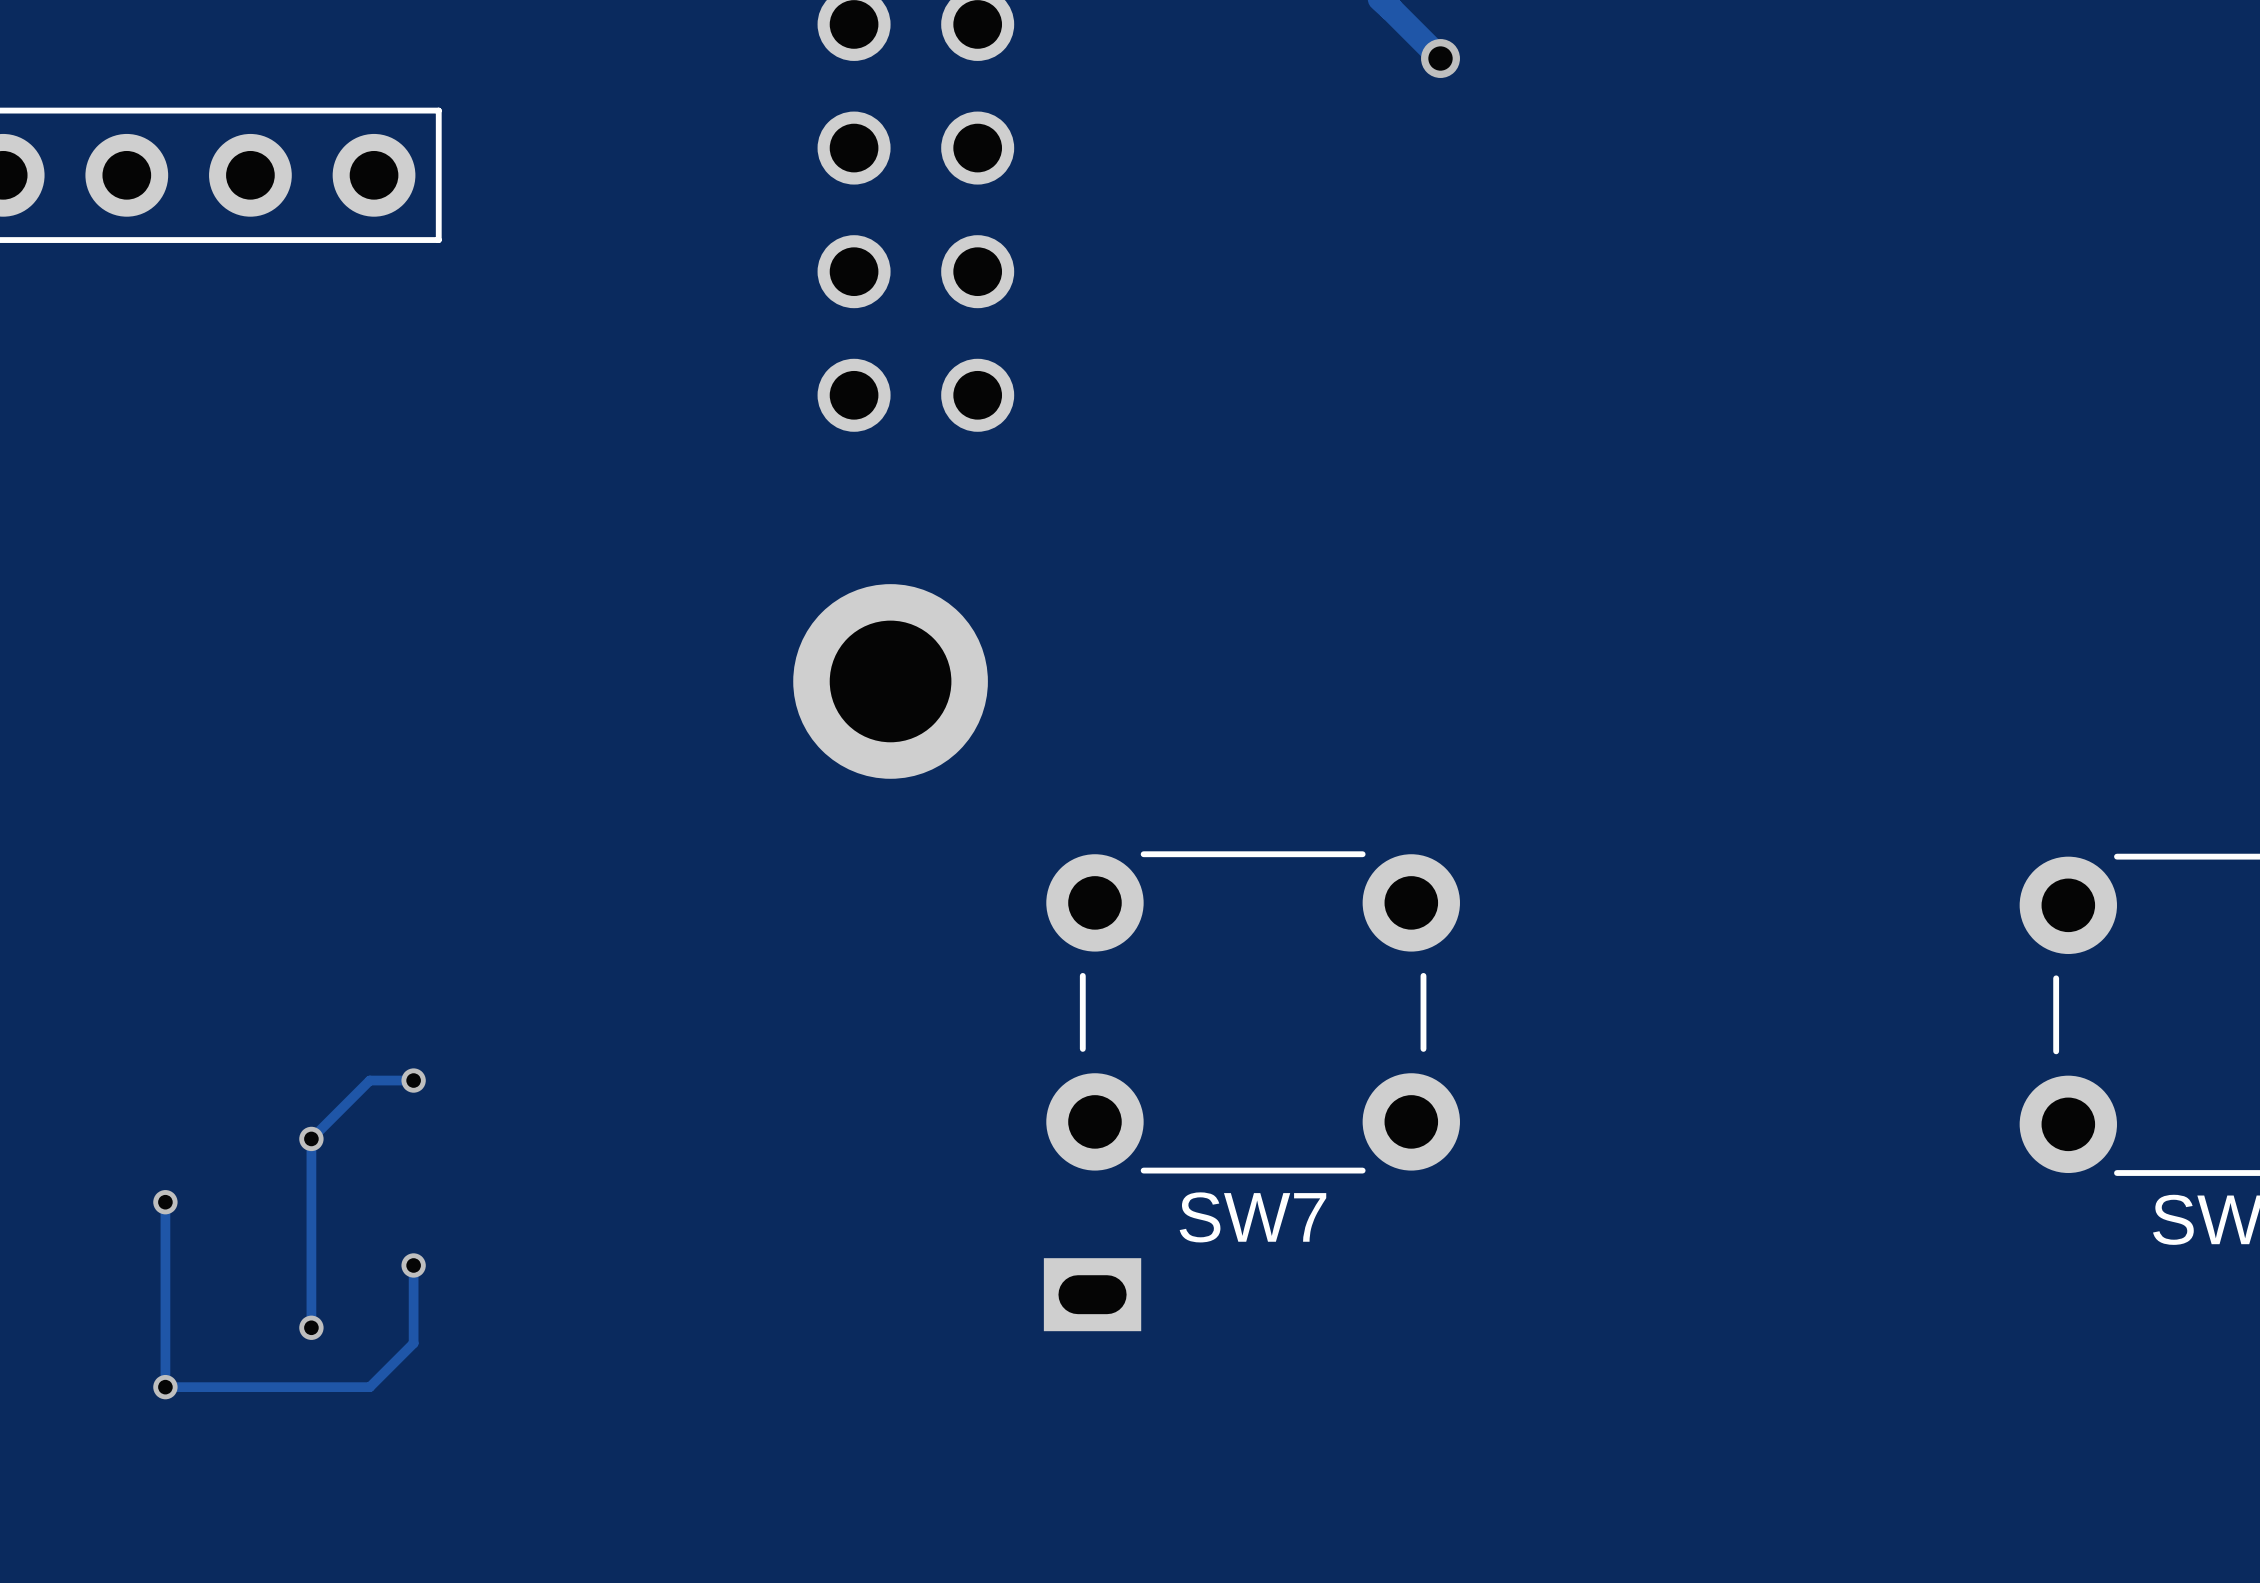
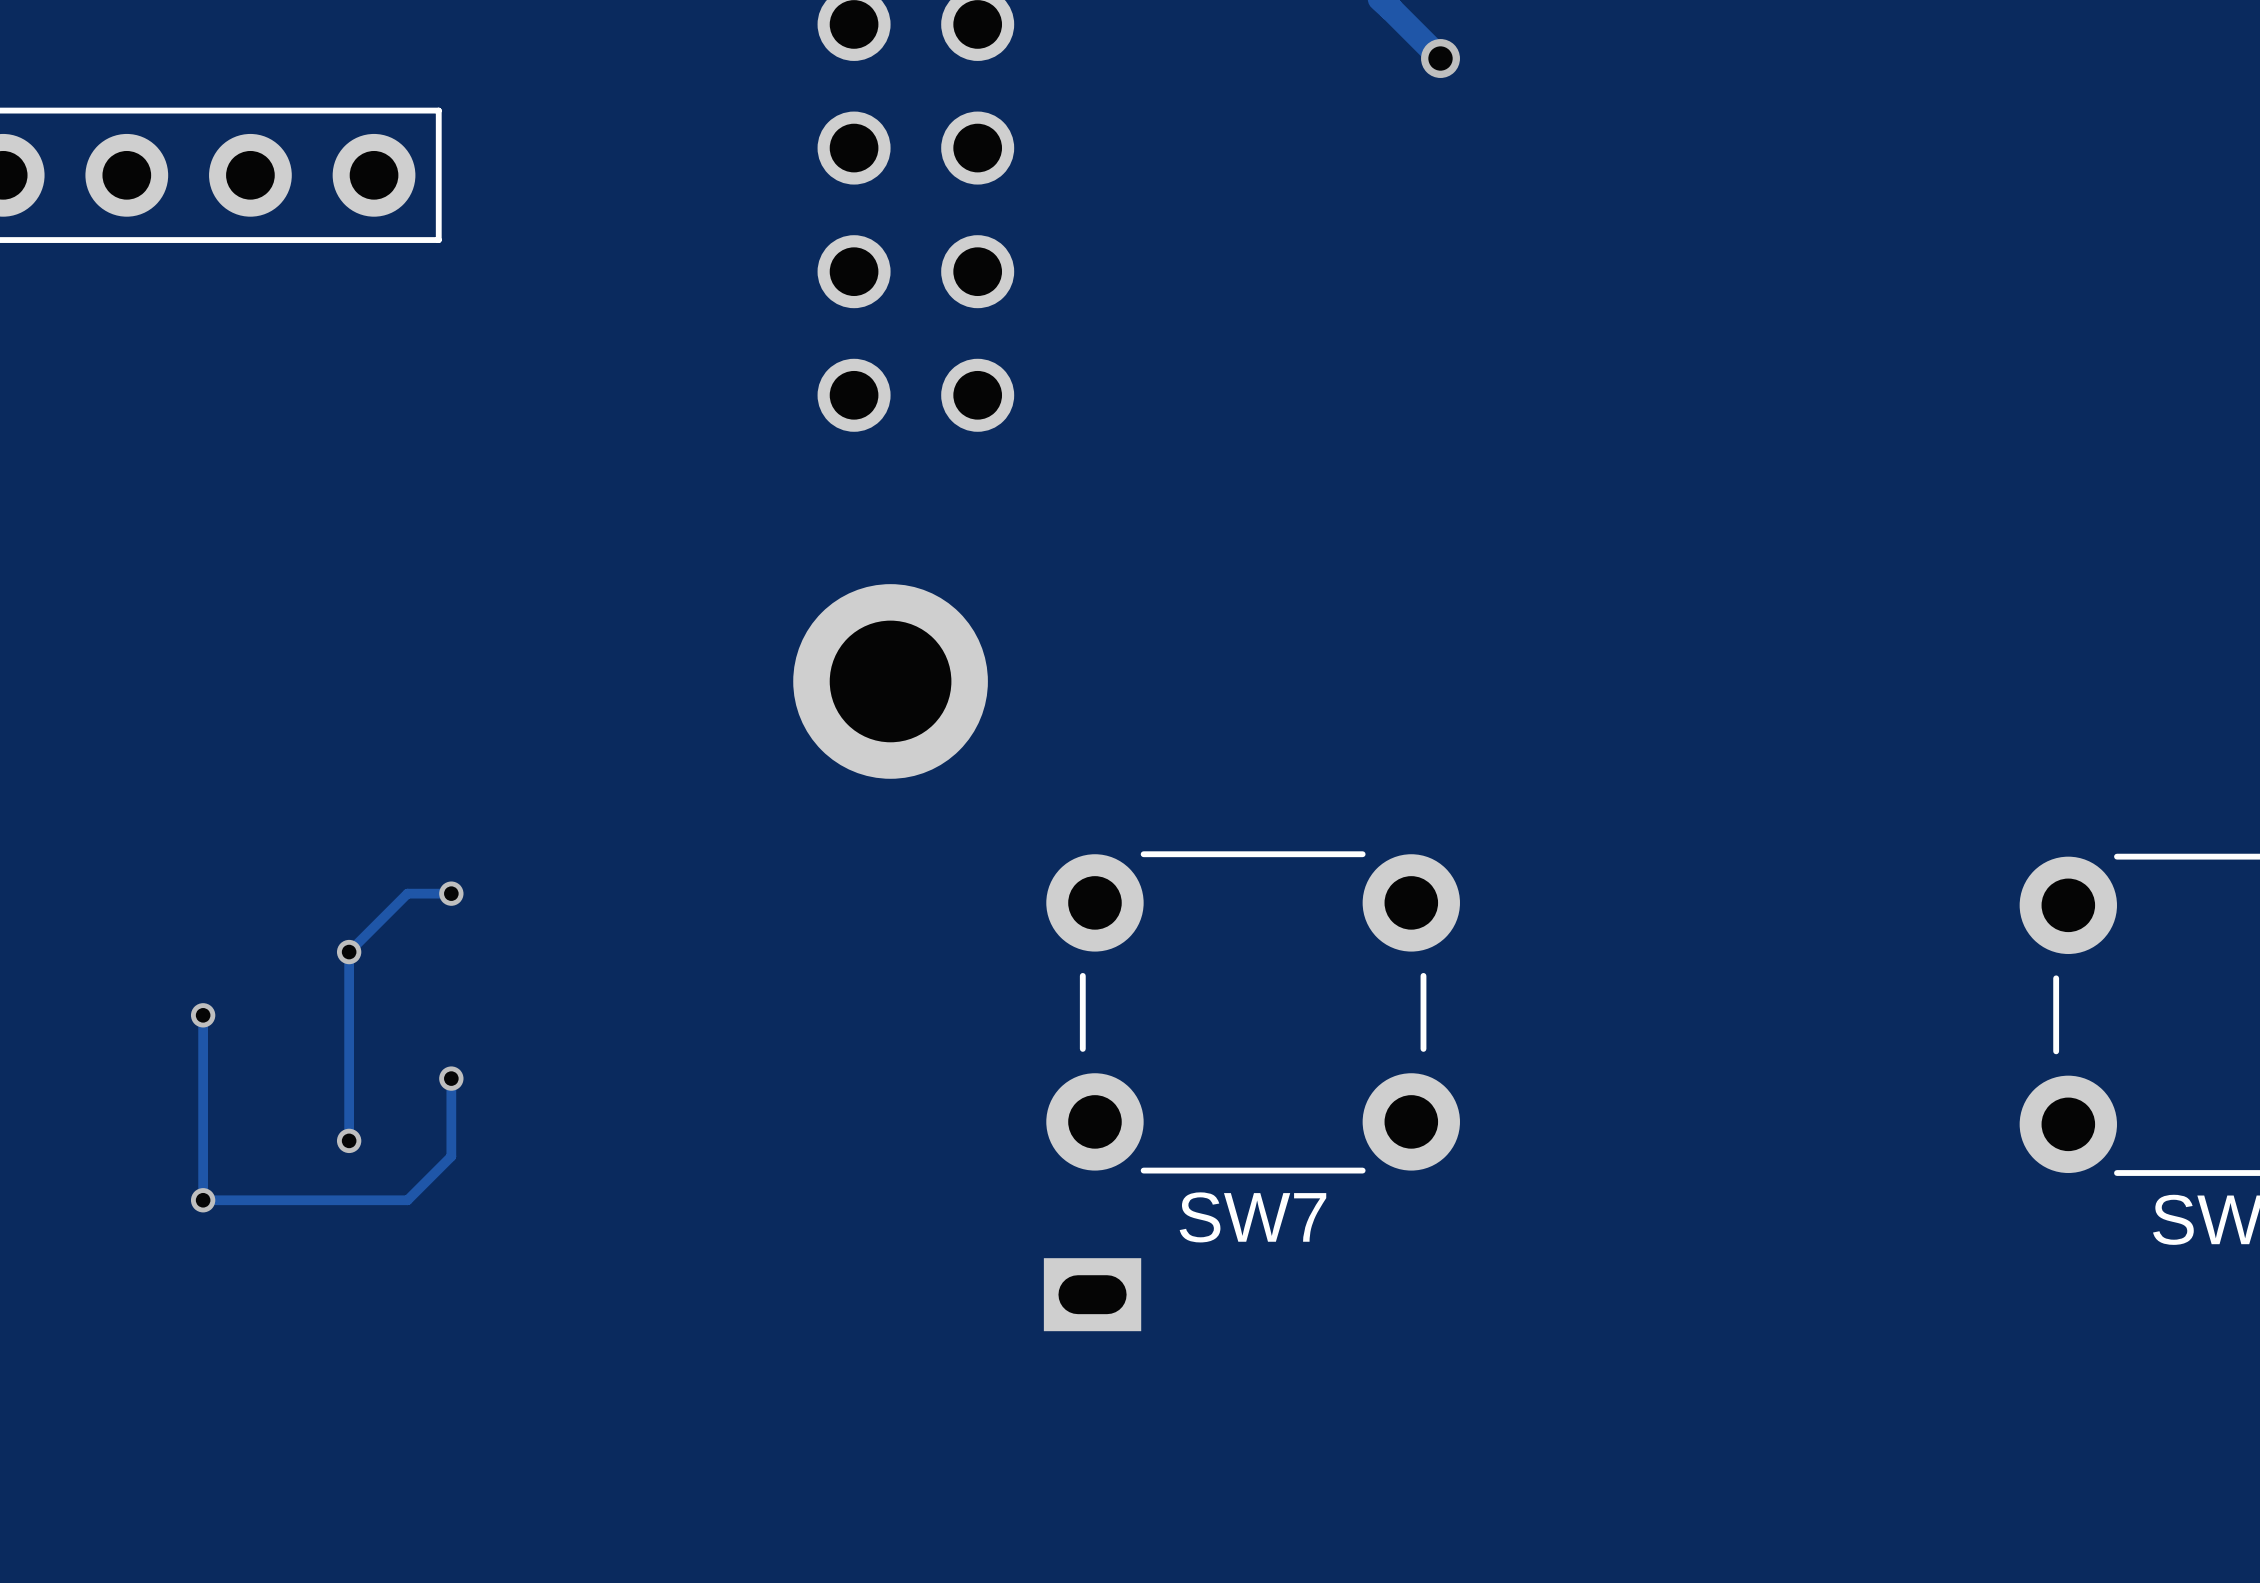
via: none -> (451, 893)
via: none -> (349, 952)
via: none -> (203, 1015)
track: (413, 1080) (369, 1080) (311, 1138) (311, 1327) -> (451, 893) (407, 893) (349, 952) (349, 1140)
via position: (413, 1080) -> (451, 1078)
via position: (311, 1138) -> (349, 1140)
track: (165, 1202) (165, 1387) (369, 1387) (413, 1343) (413, 1265) -> (203, 1015) (203, 1200) (407, 1200) (451, 1156) (451, 1078)
via position: (165, 1202) -> (203, 1200)
via: (413, 1265) -> none
via: (311, 1327) -> none
via: (165, 1387) -> none

